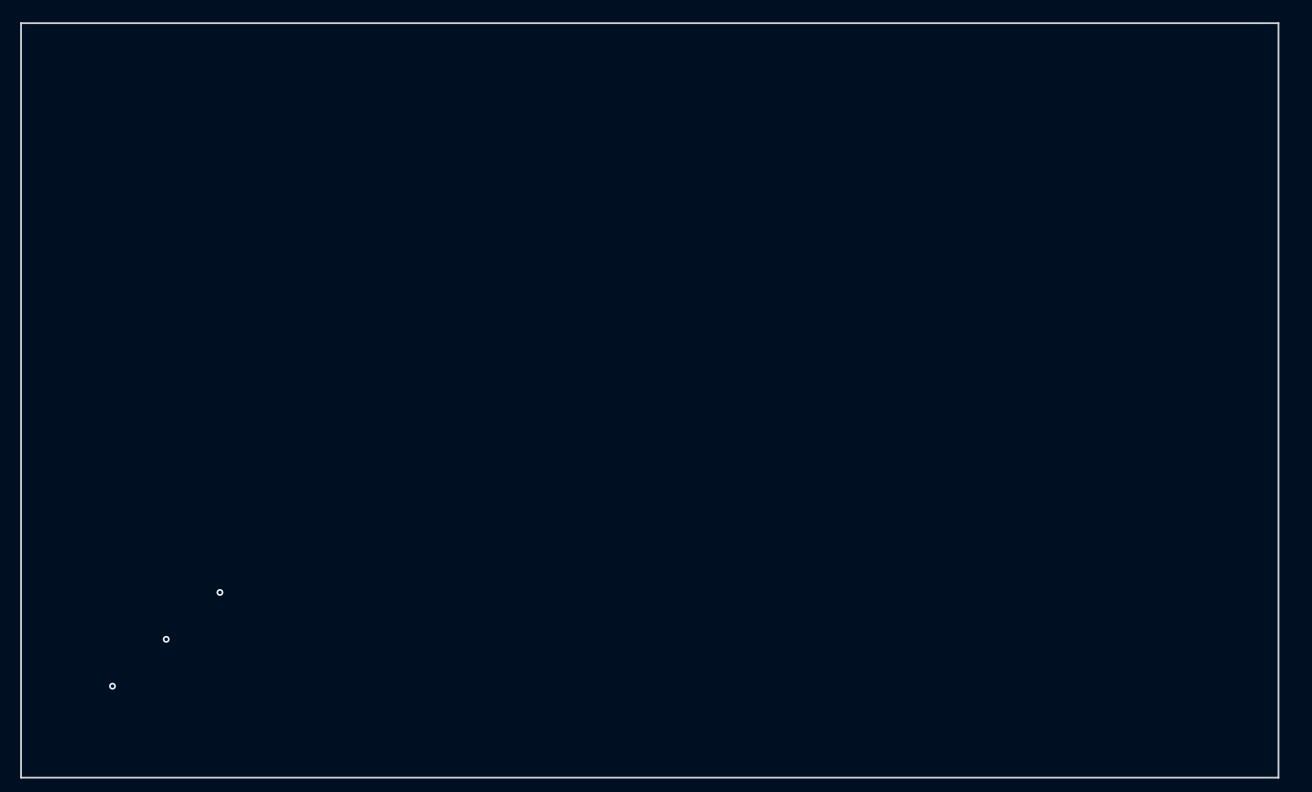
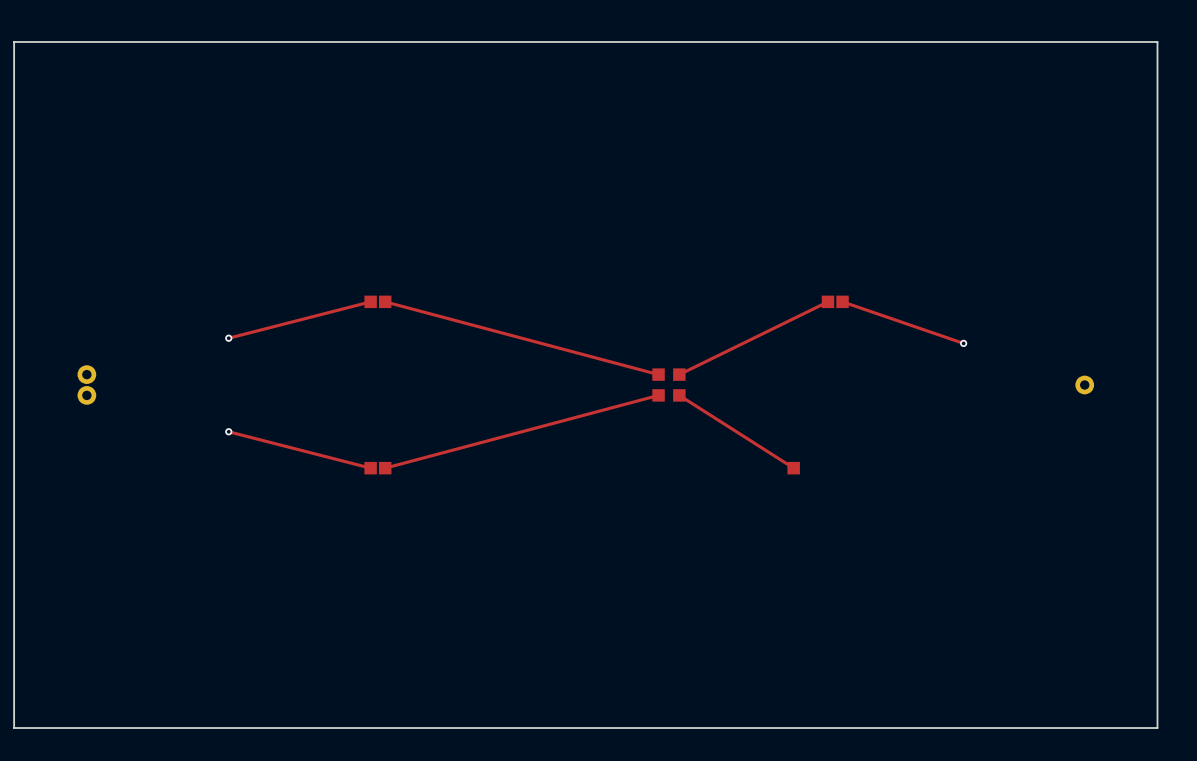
track: none -> (370, 301) (228, 338)
part: none -> (377, 301)
track: none -> (385, 301) (658, 374)
track: none -> (827, 301) (679, 374)
part: none -> (835, 301)
track: none -> (842, 301) (963, 343)
via: none -> (228, 338)
via: none -> (963, 343)
part: none -> (86, 385)
part: none -> (668, 385)
part: none -> (1084, 385)
track: none -> (658, 395) (385, 468)
track: none -> (679, 395) (793, 468)
track: none -> (228, 431) (370, 468)
via: none -> (228, 431)
part: none -> (377, 468)
part: none -> (793, 468)
via: (219, 592) -> none
via: (166, 639) -> none
via: (112, 686) -> none

